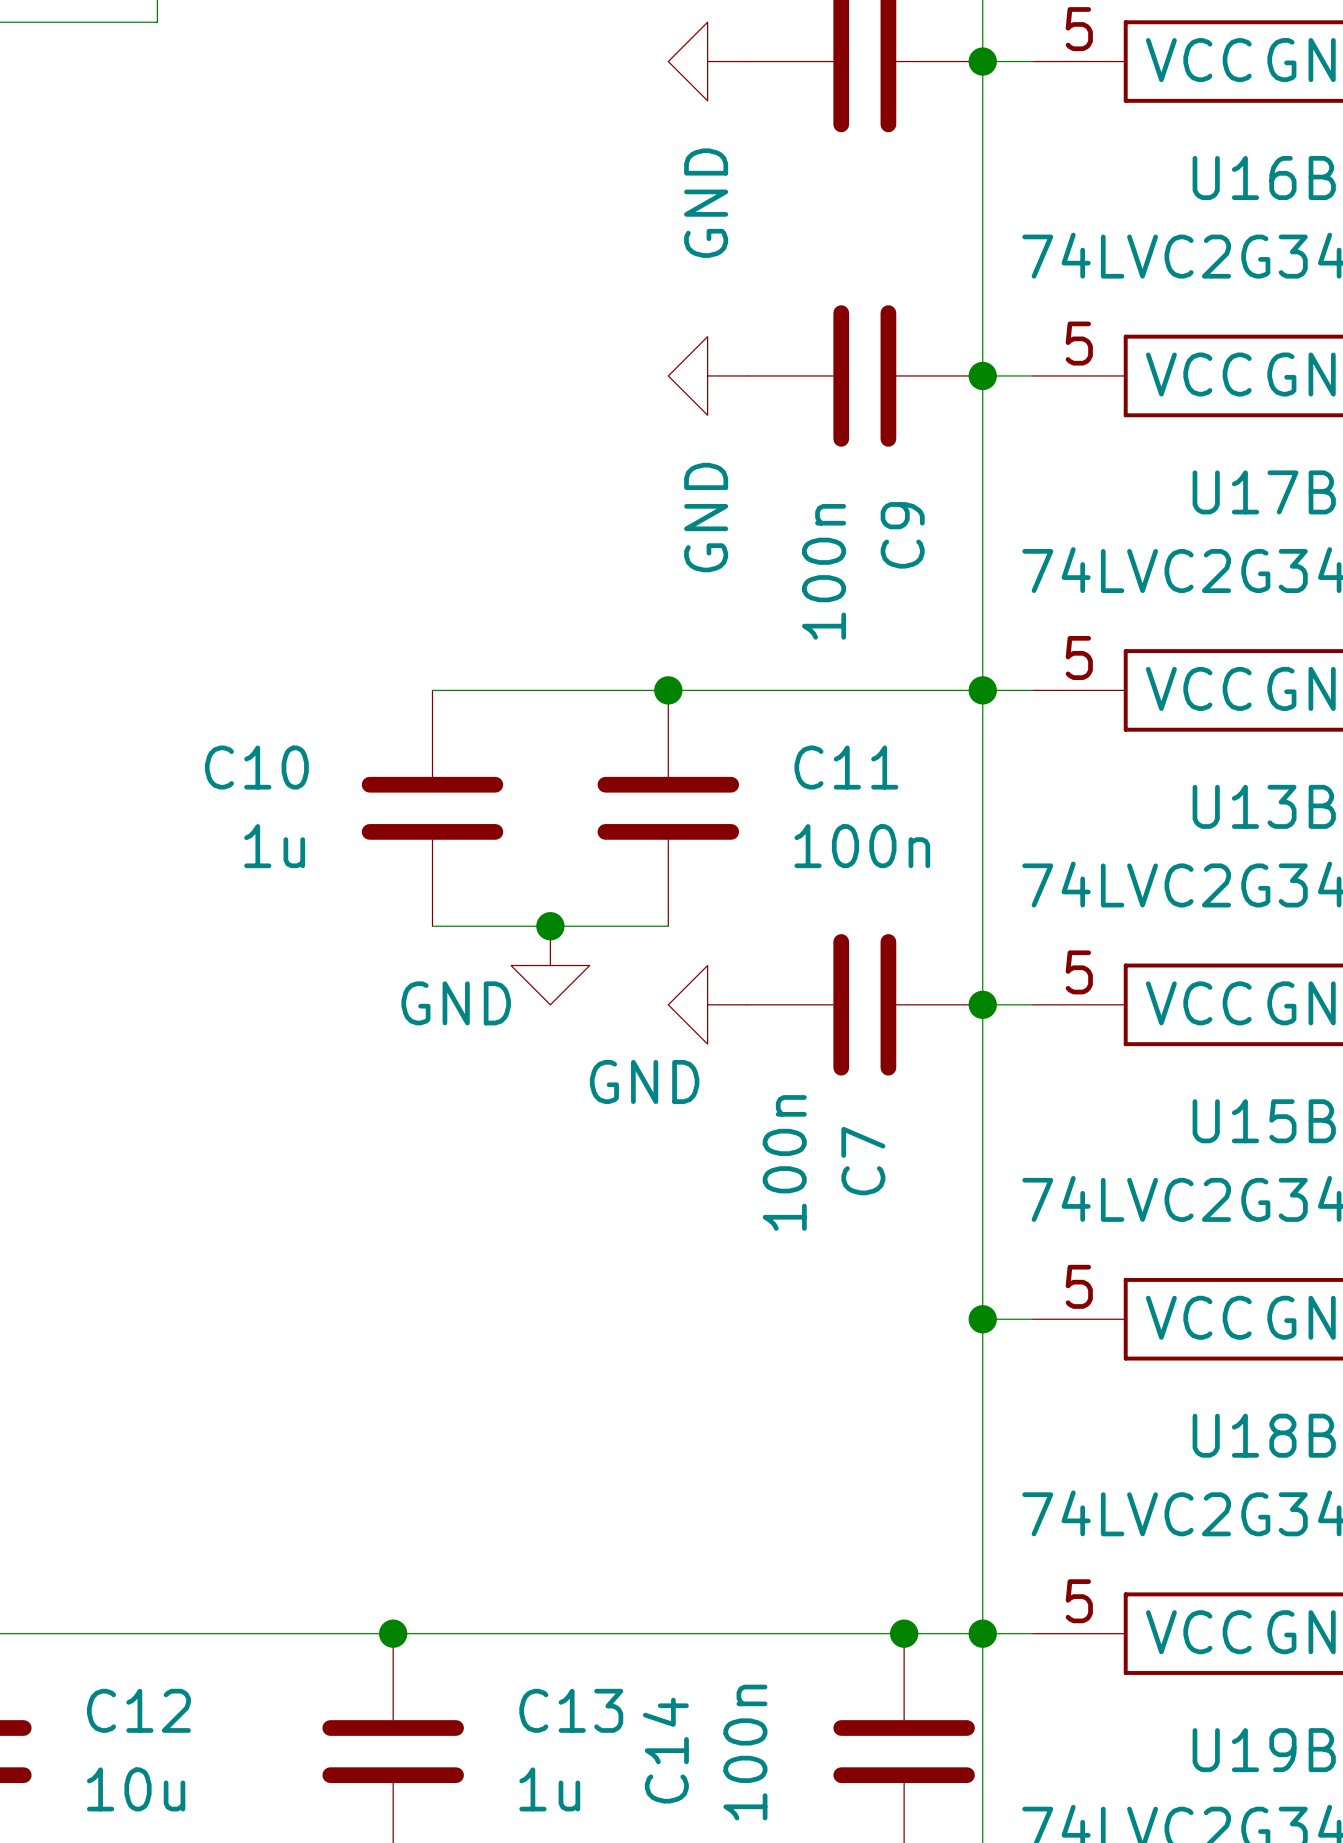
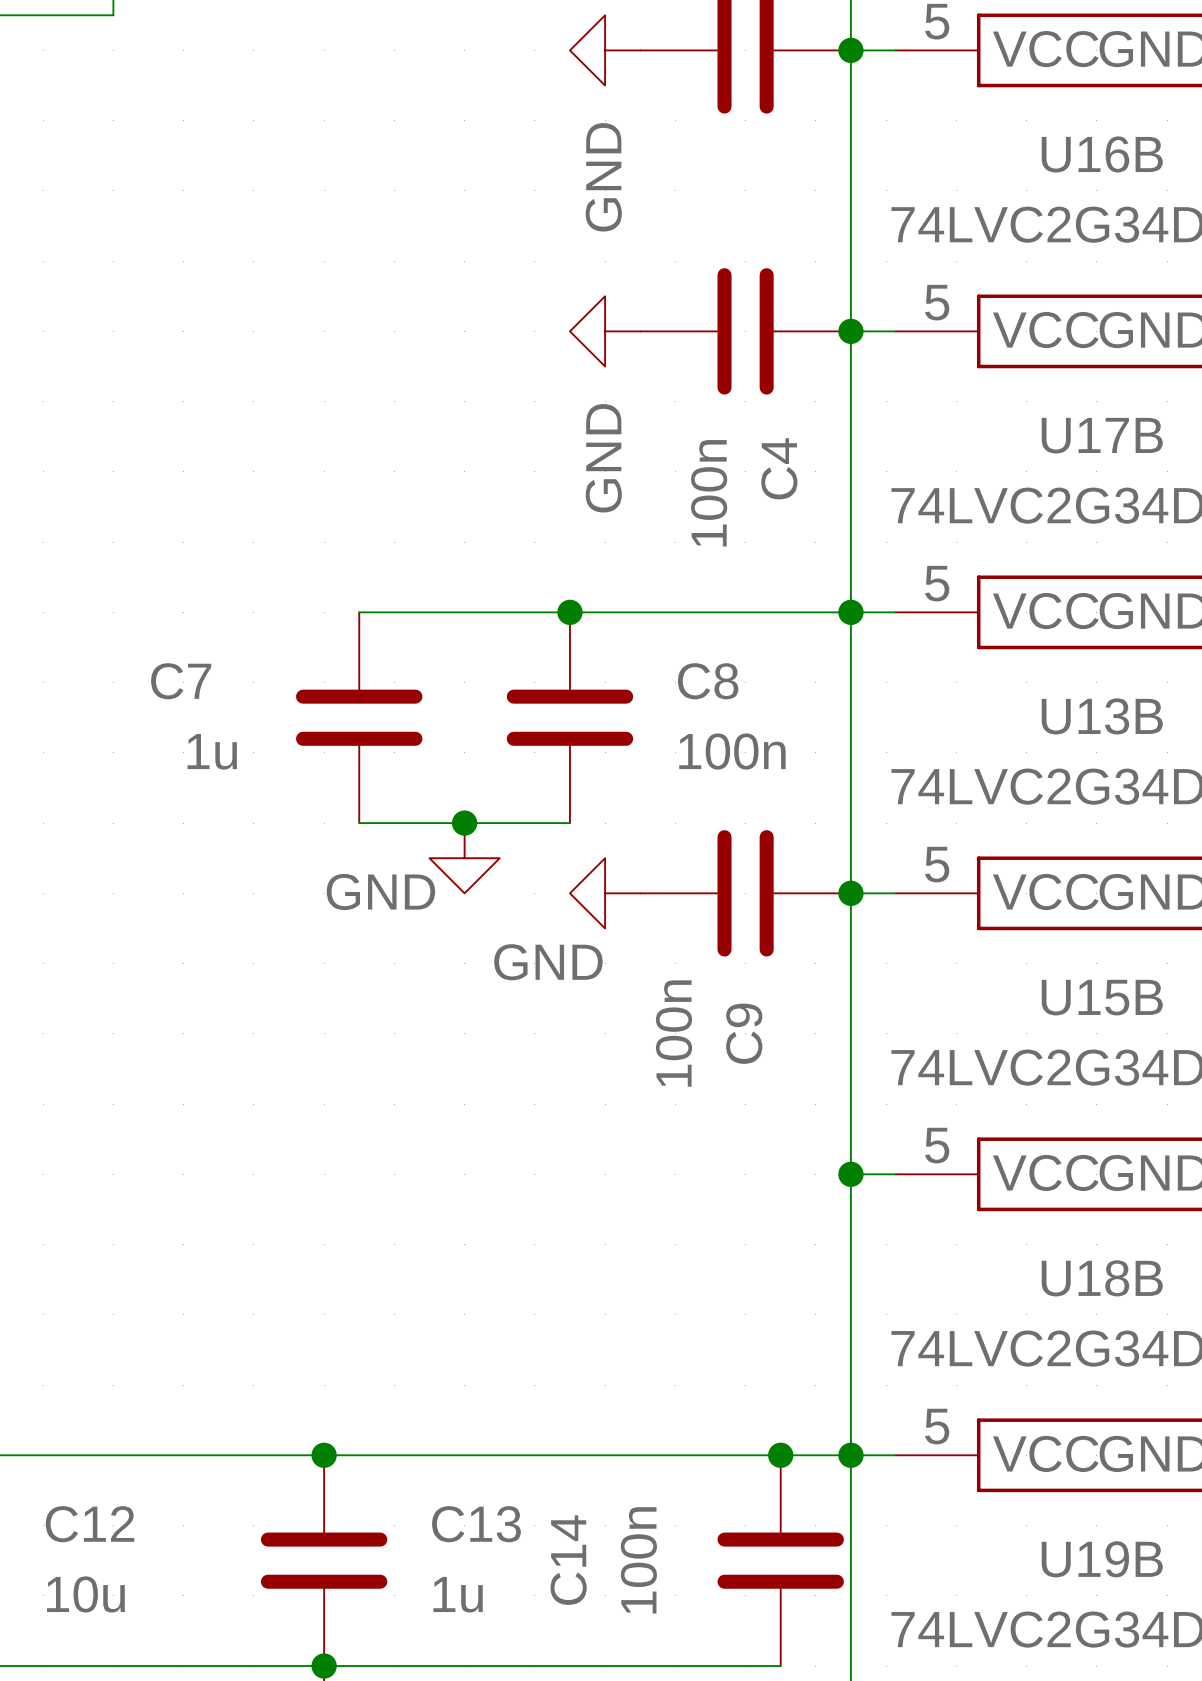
C9 name: C9 (902, 535) -> C4 (779, 468)
C10 name: C10 (256, 767) -> C7 (181, 681)
C11 name: C11 (846, 767) -> C8 (708, 681)
C7 name: C7 (863, 1161) -> C9 (744, 1033)

